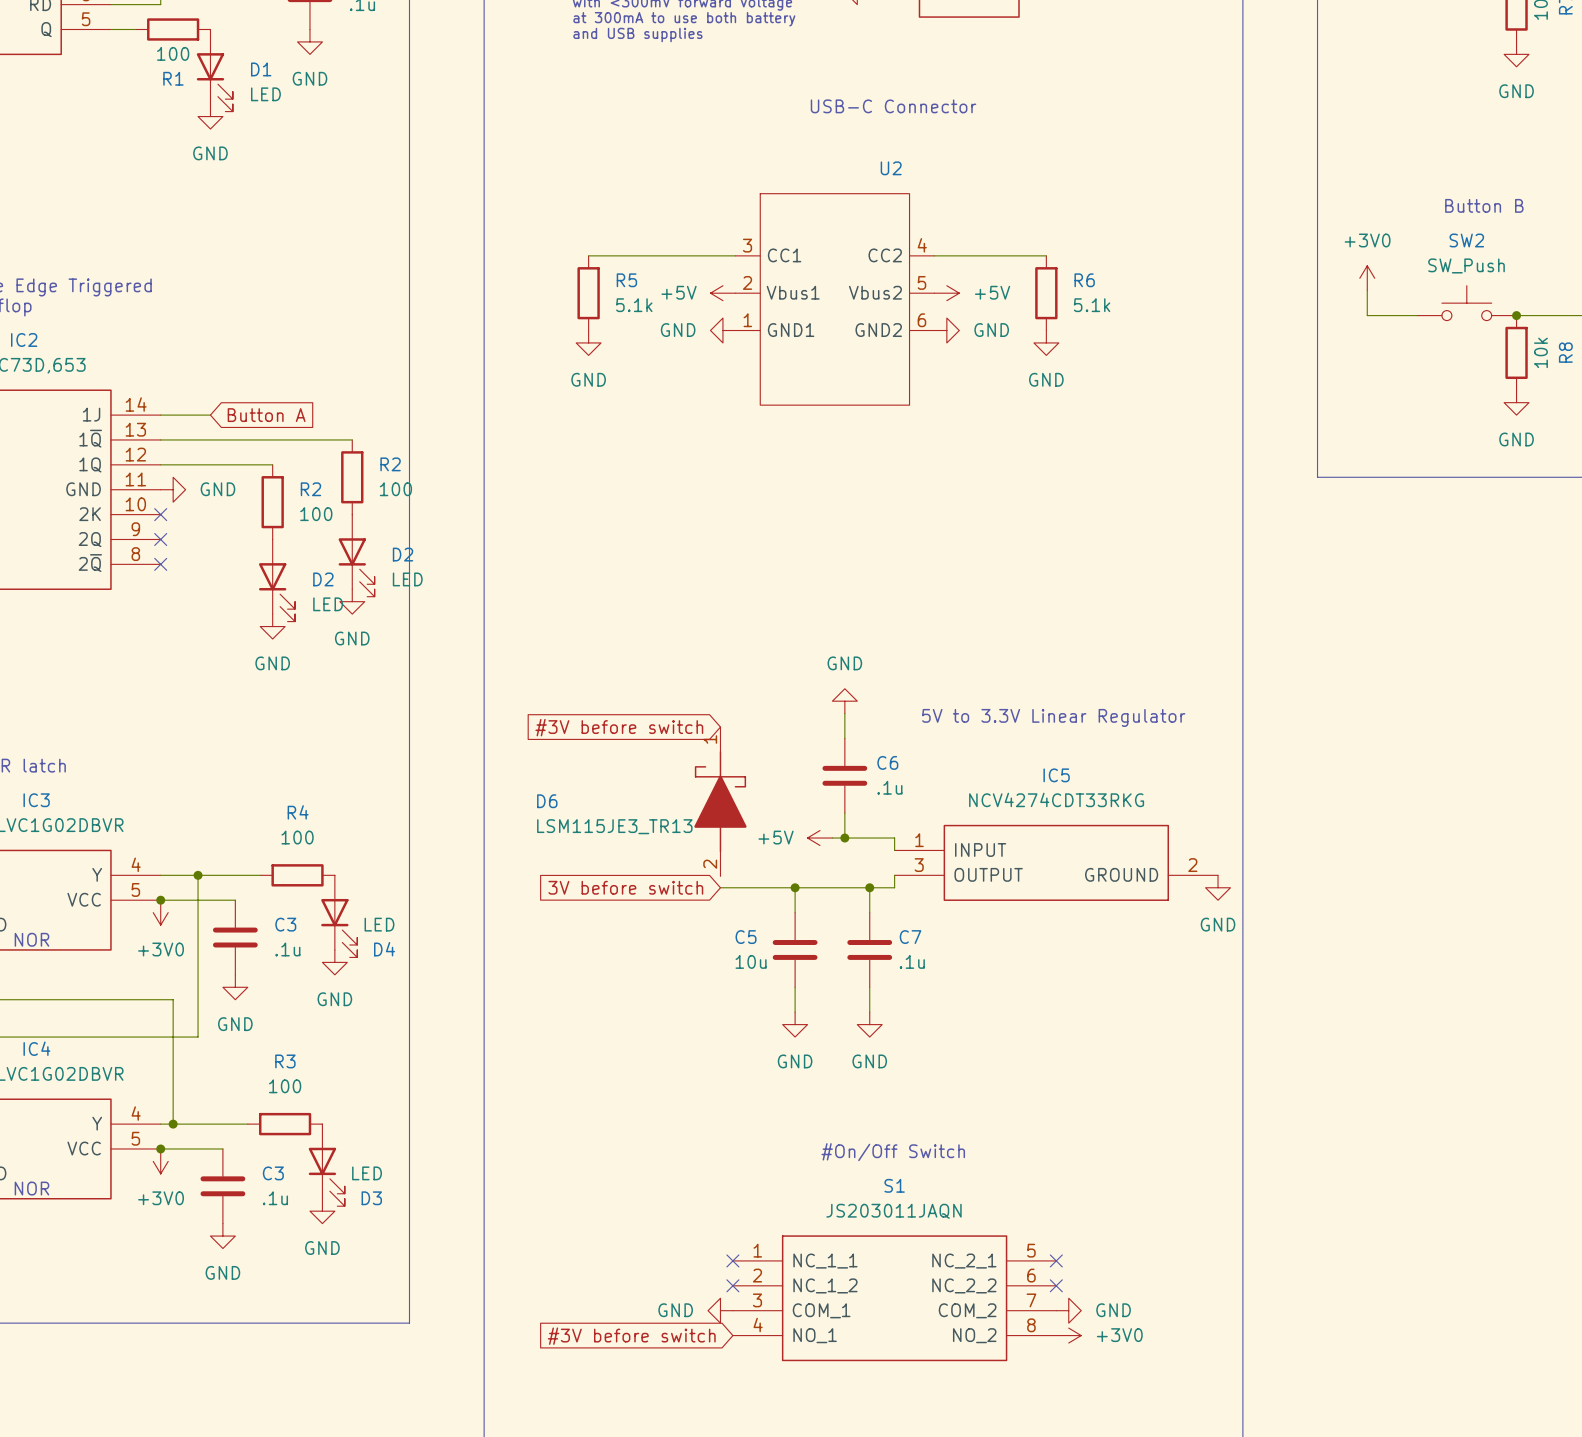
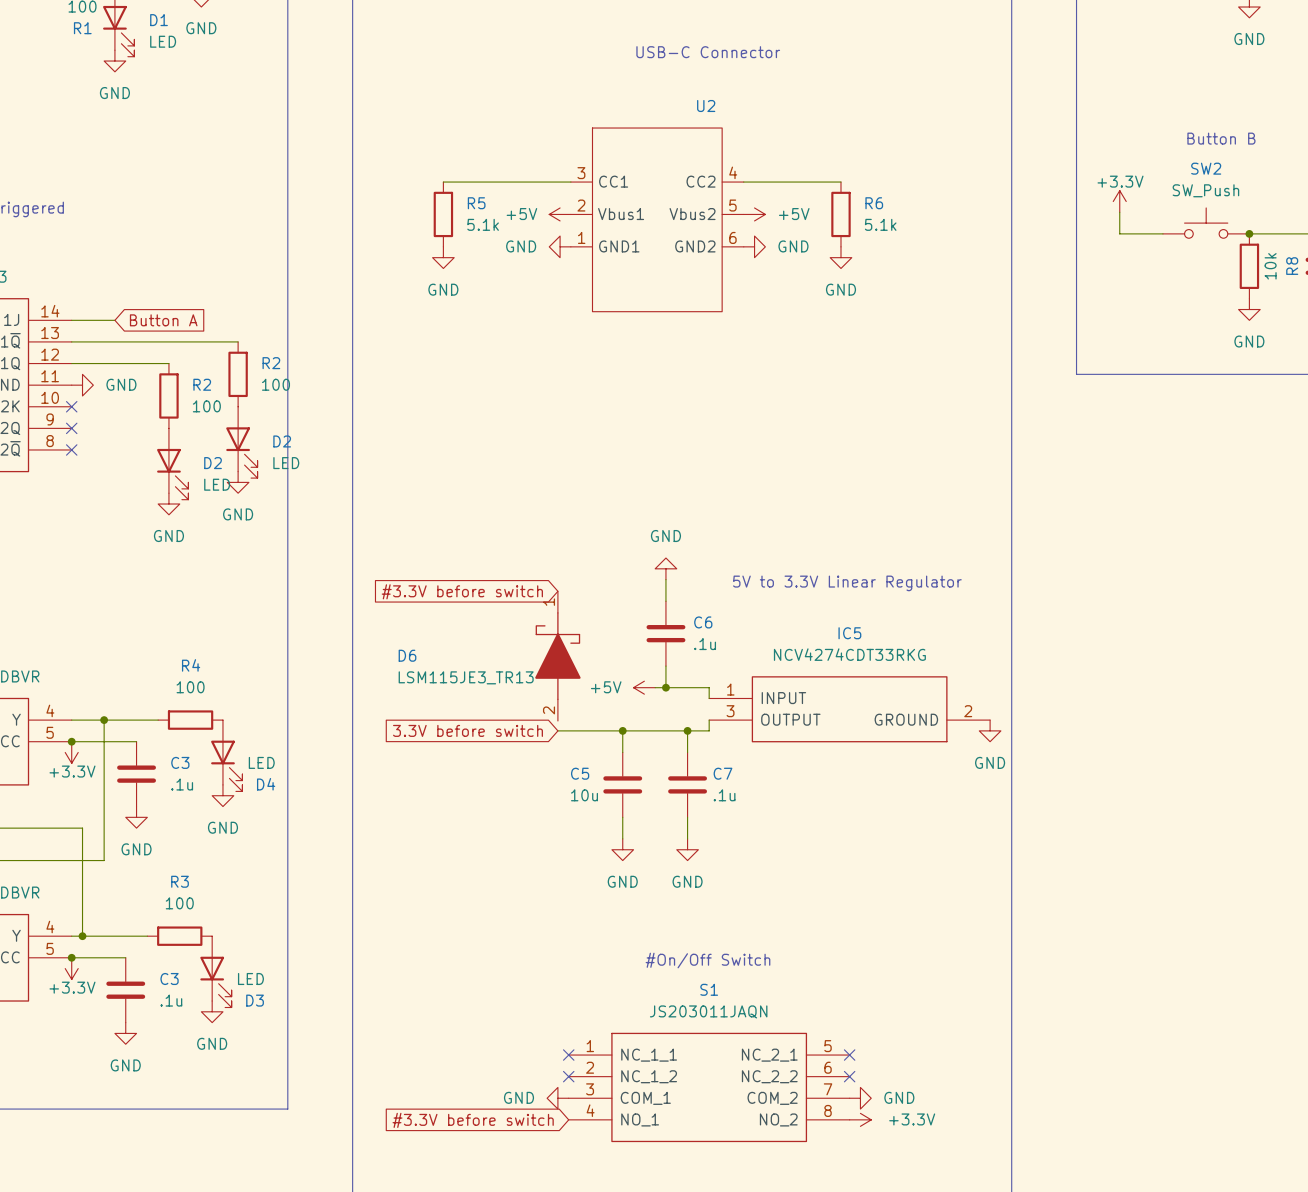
power symbol: +3V0 (1367, 278) -> +3.3V (1119, 201)
global label: #3V before switch (619, 727) -> #3.3V before switch (462, 591)
global label: 3V before switch (625, 887) -> 3.3V before switch (467, 730)
power symbol: +3V0 (160, 912) -> +3.3V (71, 752)
power symbol: +3V0 (160, 1161) -> +3.3V (71, 968)
power symbol: +3V0 (1068, 1335) -> +3.3V (860, 1119)
global label: #3V before switch (631, 1336) -> #3.3V before switch (473, 1120)

